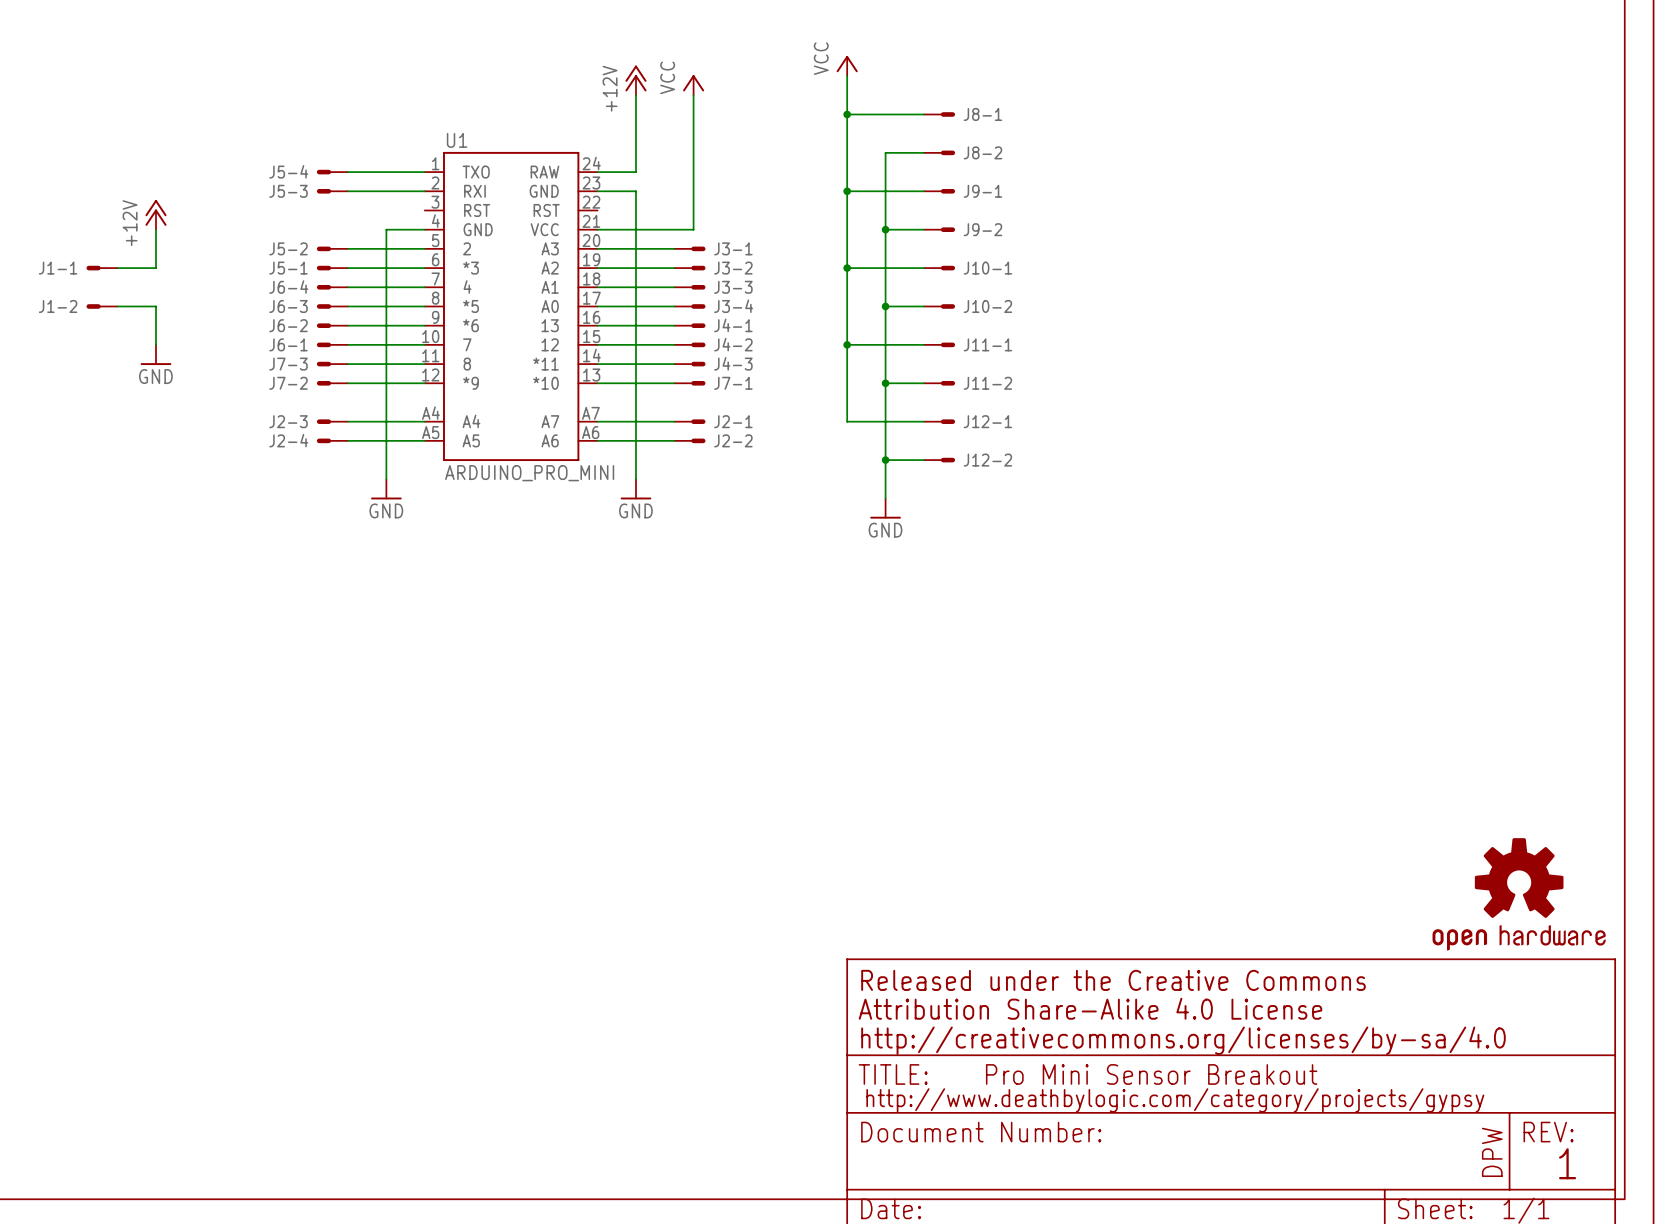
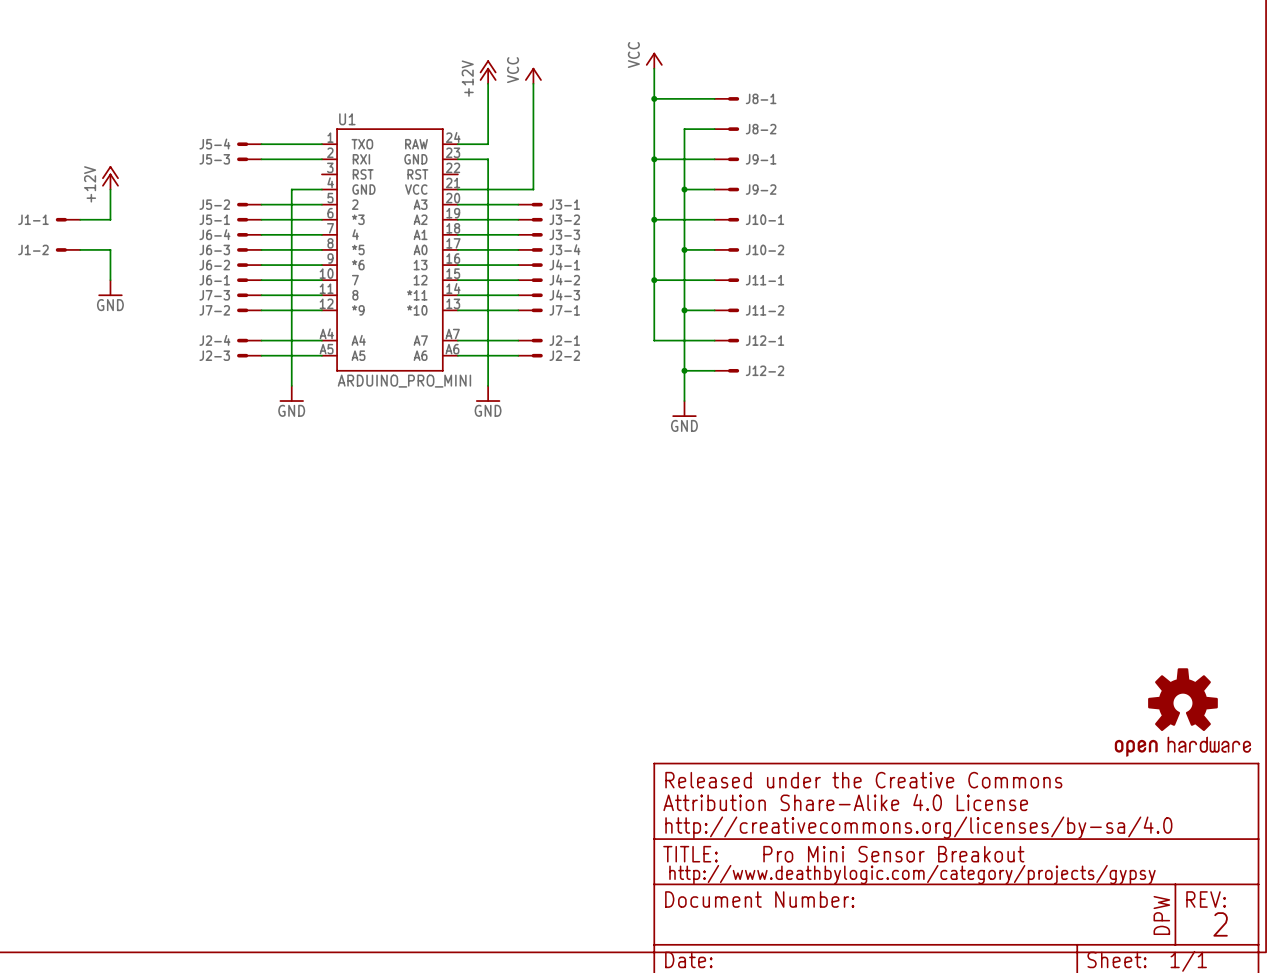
J2-3 name: J2-3 (288, 421) -> J2-4 (214, 340)
J2-4 name: J2-4 (288, 440) -> J2-3 (214, 355)
text: 1 (1567, 1163) -> 2 (1220, 924)

